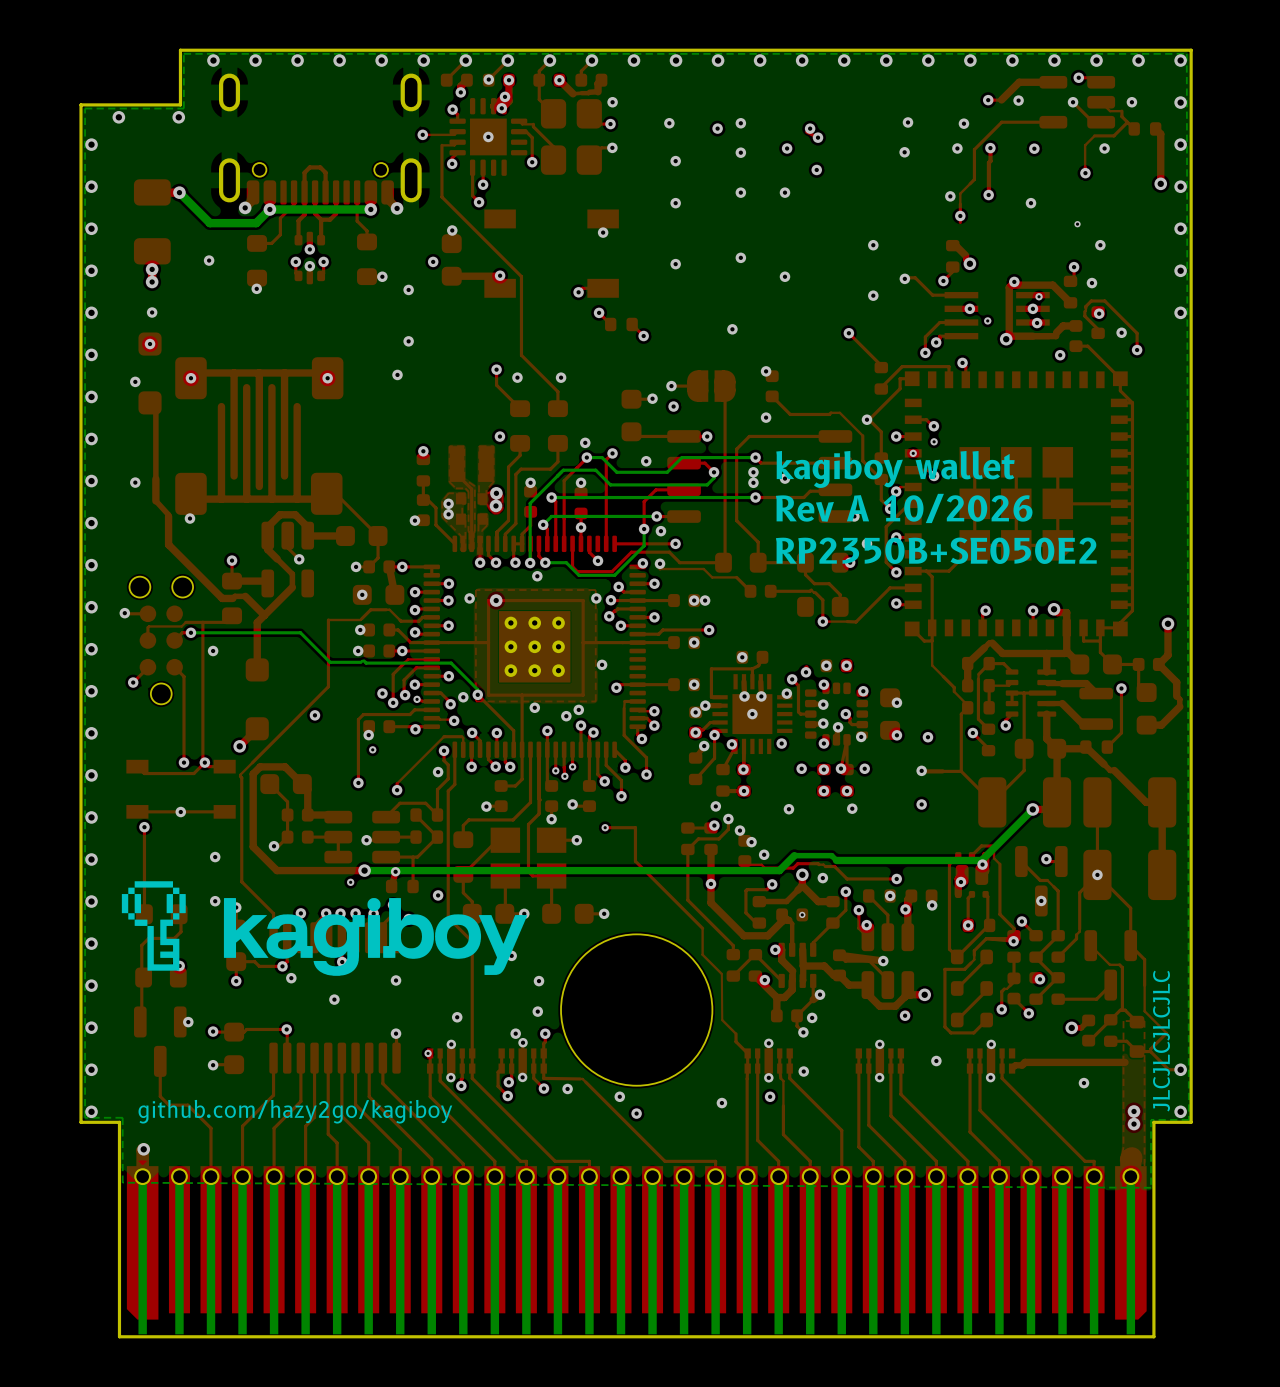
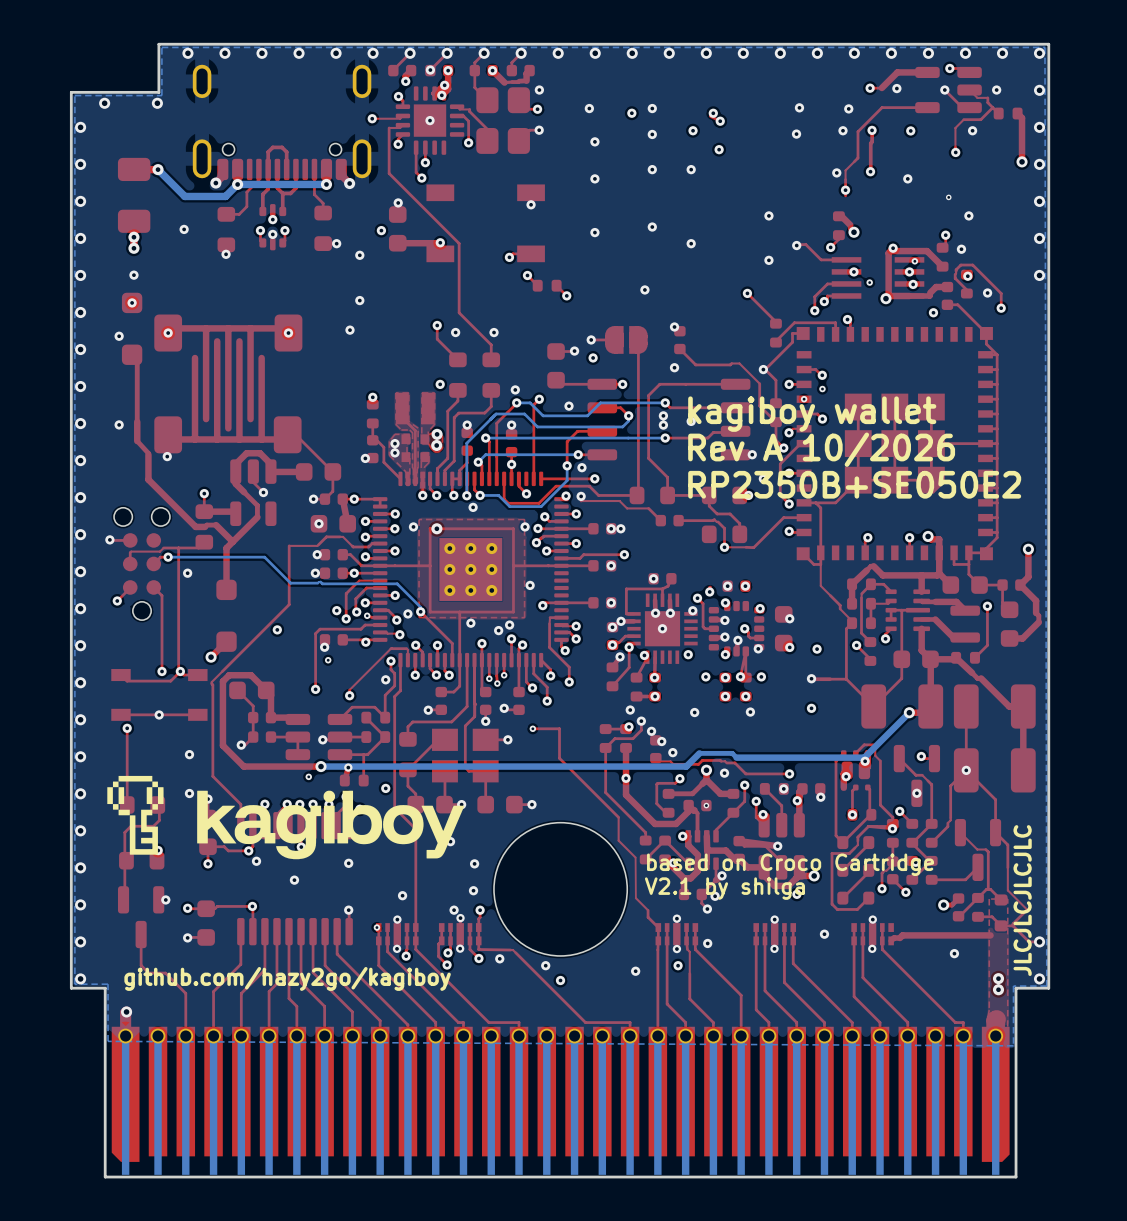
text: none -> based on Croco Cartridge (790, 864)
text: none -> V2.1 by shilga (724, 888)

